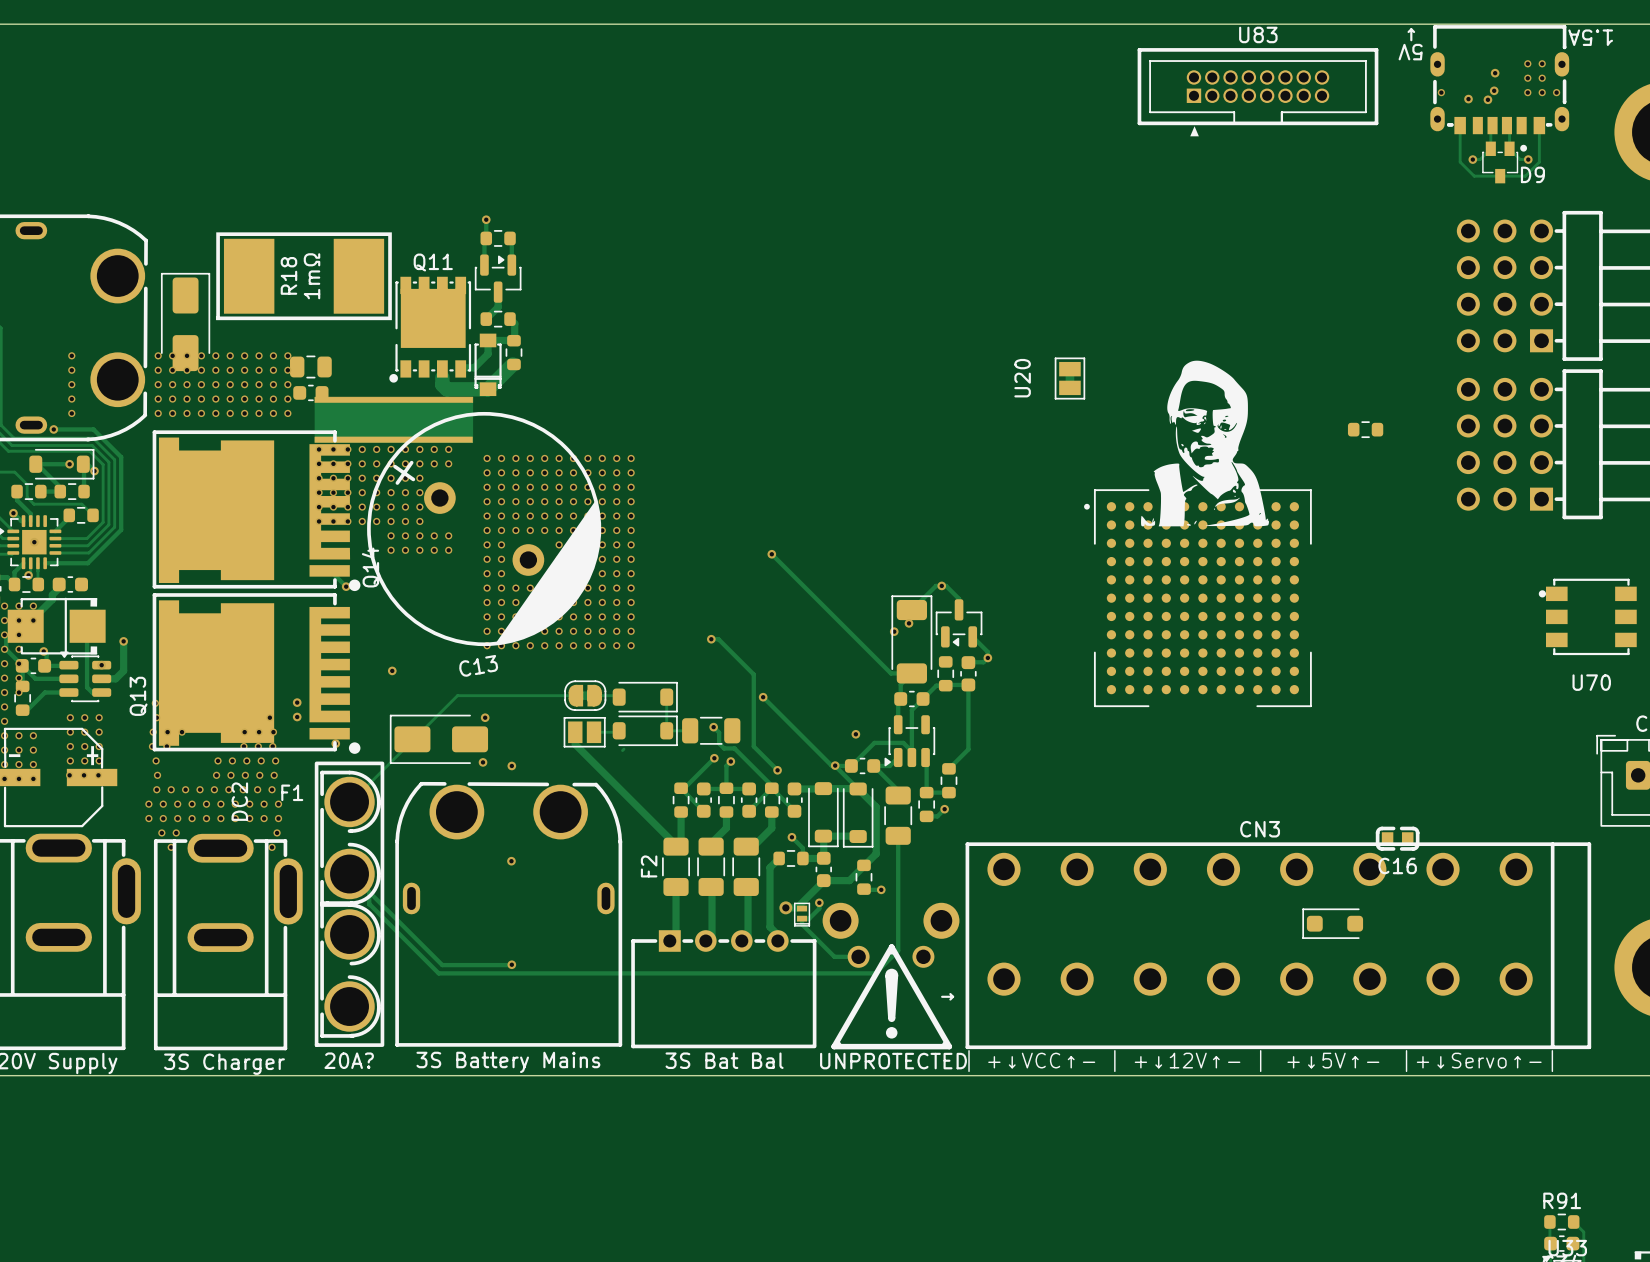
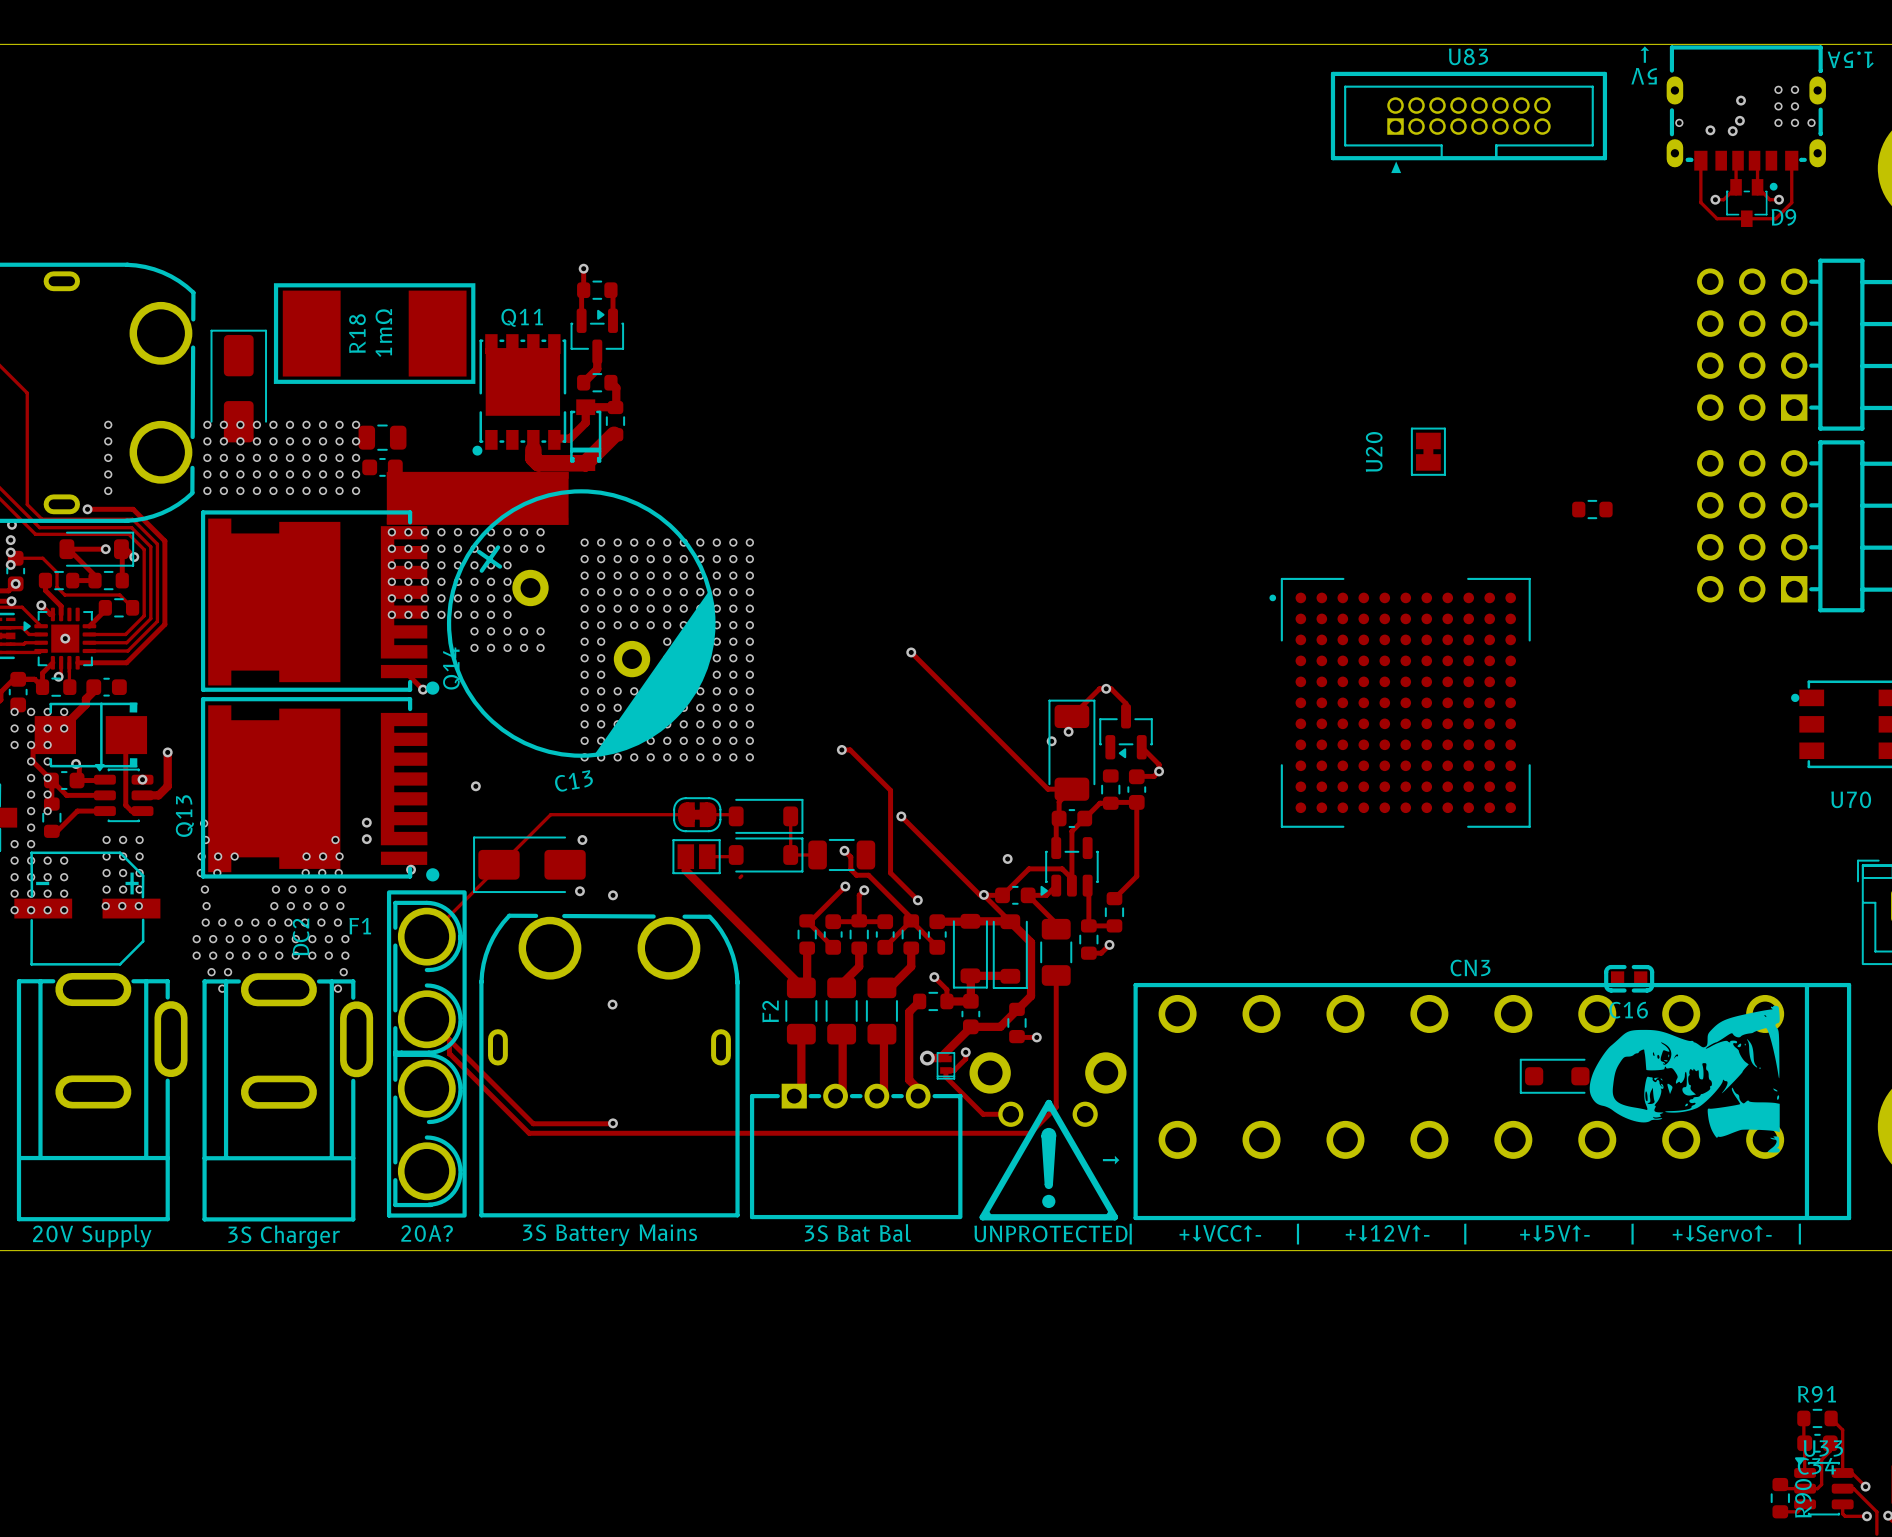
drawing: [1141, 360, 1269, 527] -> none
U20 position: (1069, 378) -> (1428, 451)
drawing: none -> [1589, 1005, 1780, 1153]

